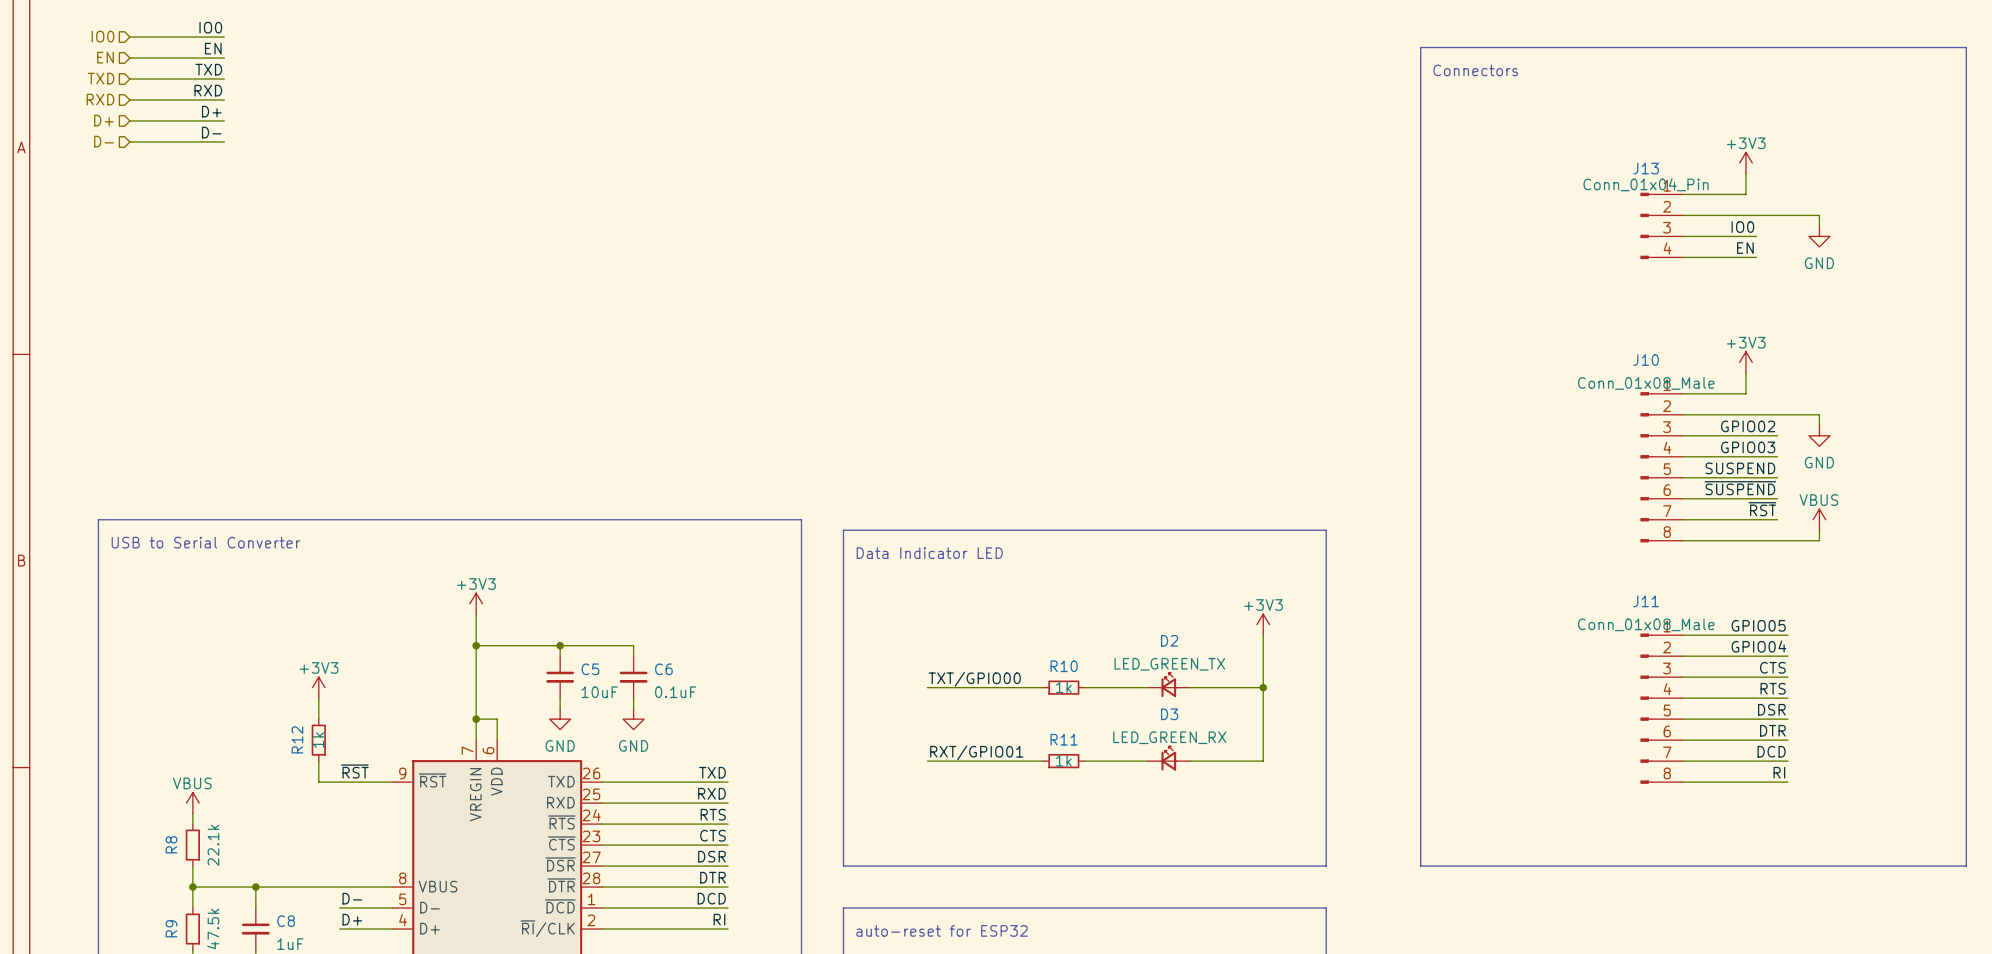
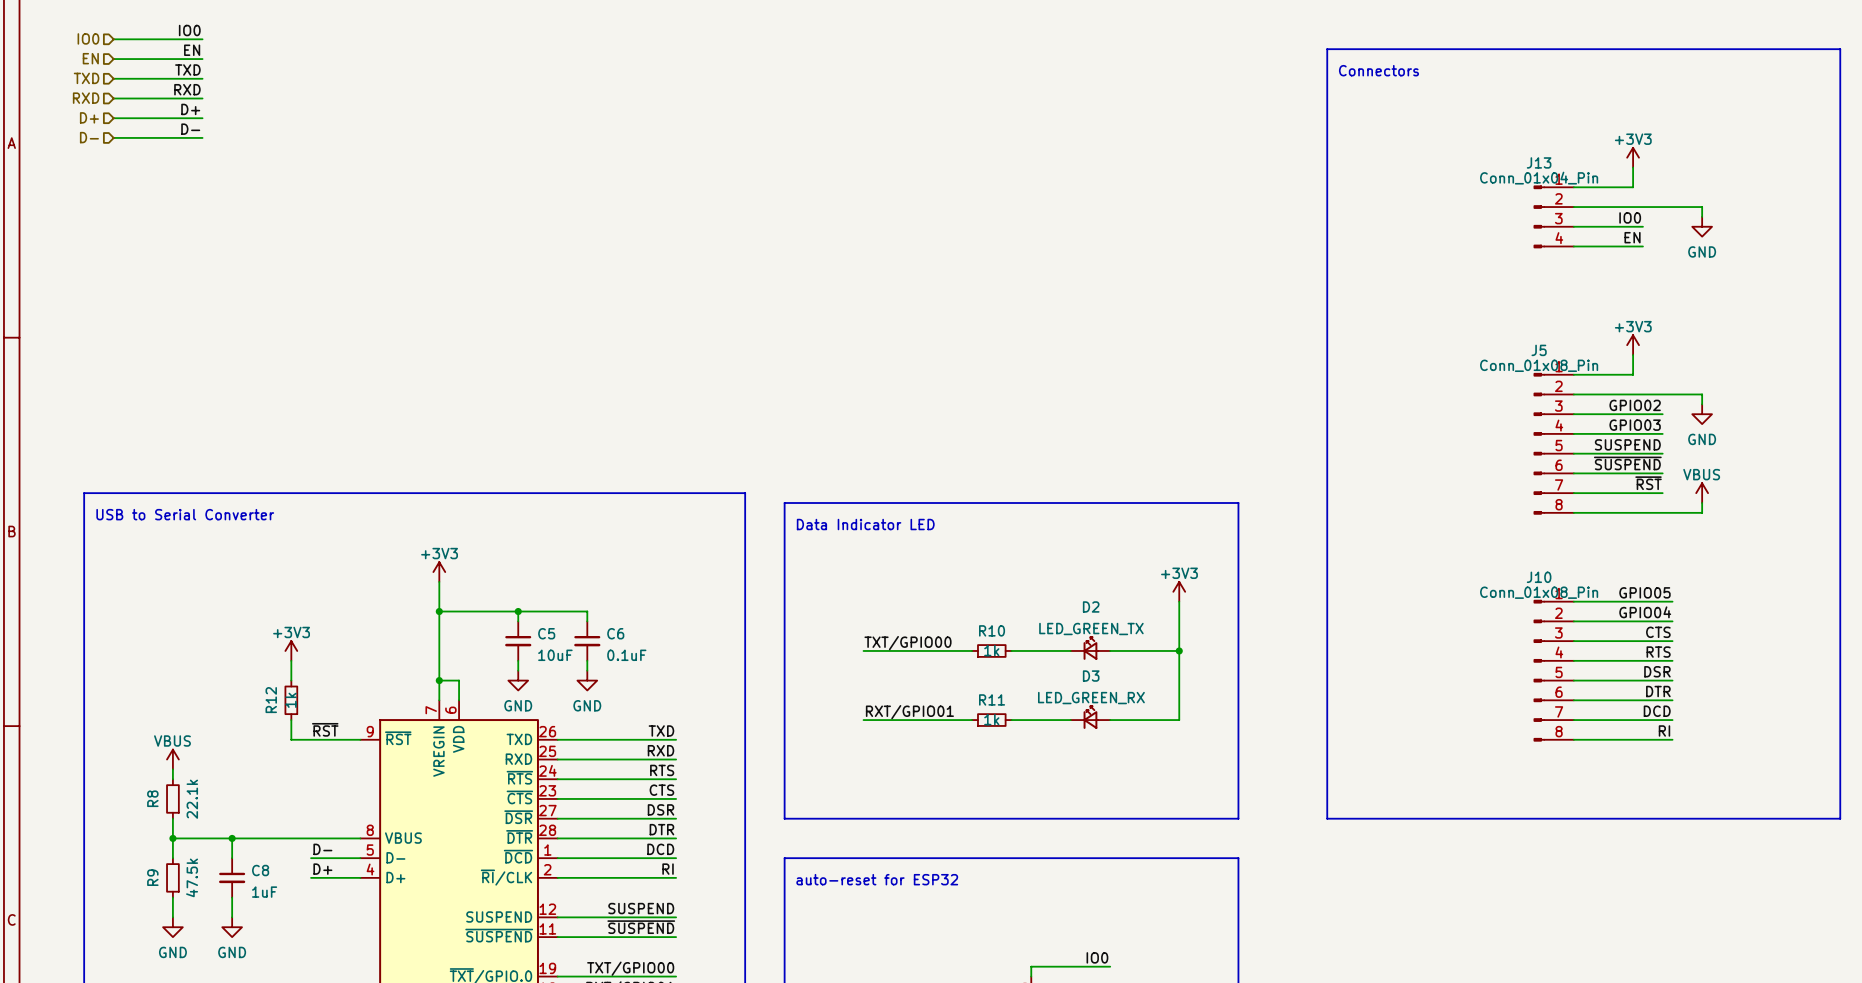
J10 name: J10 (1646, 360) -> J5 (1539, 350)
J10 value: Conn_01x08_Male (1646, 383) -> Conn_01x08_Pin (1539, 365)
J11 name: J11 (1646, 601) -> J10 (1539, 577)
J11 value: Conn_01x08_Male (1646, 624) -> Conn_01x08_Pin (1539, 592)

